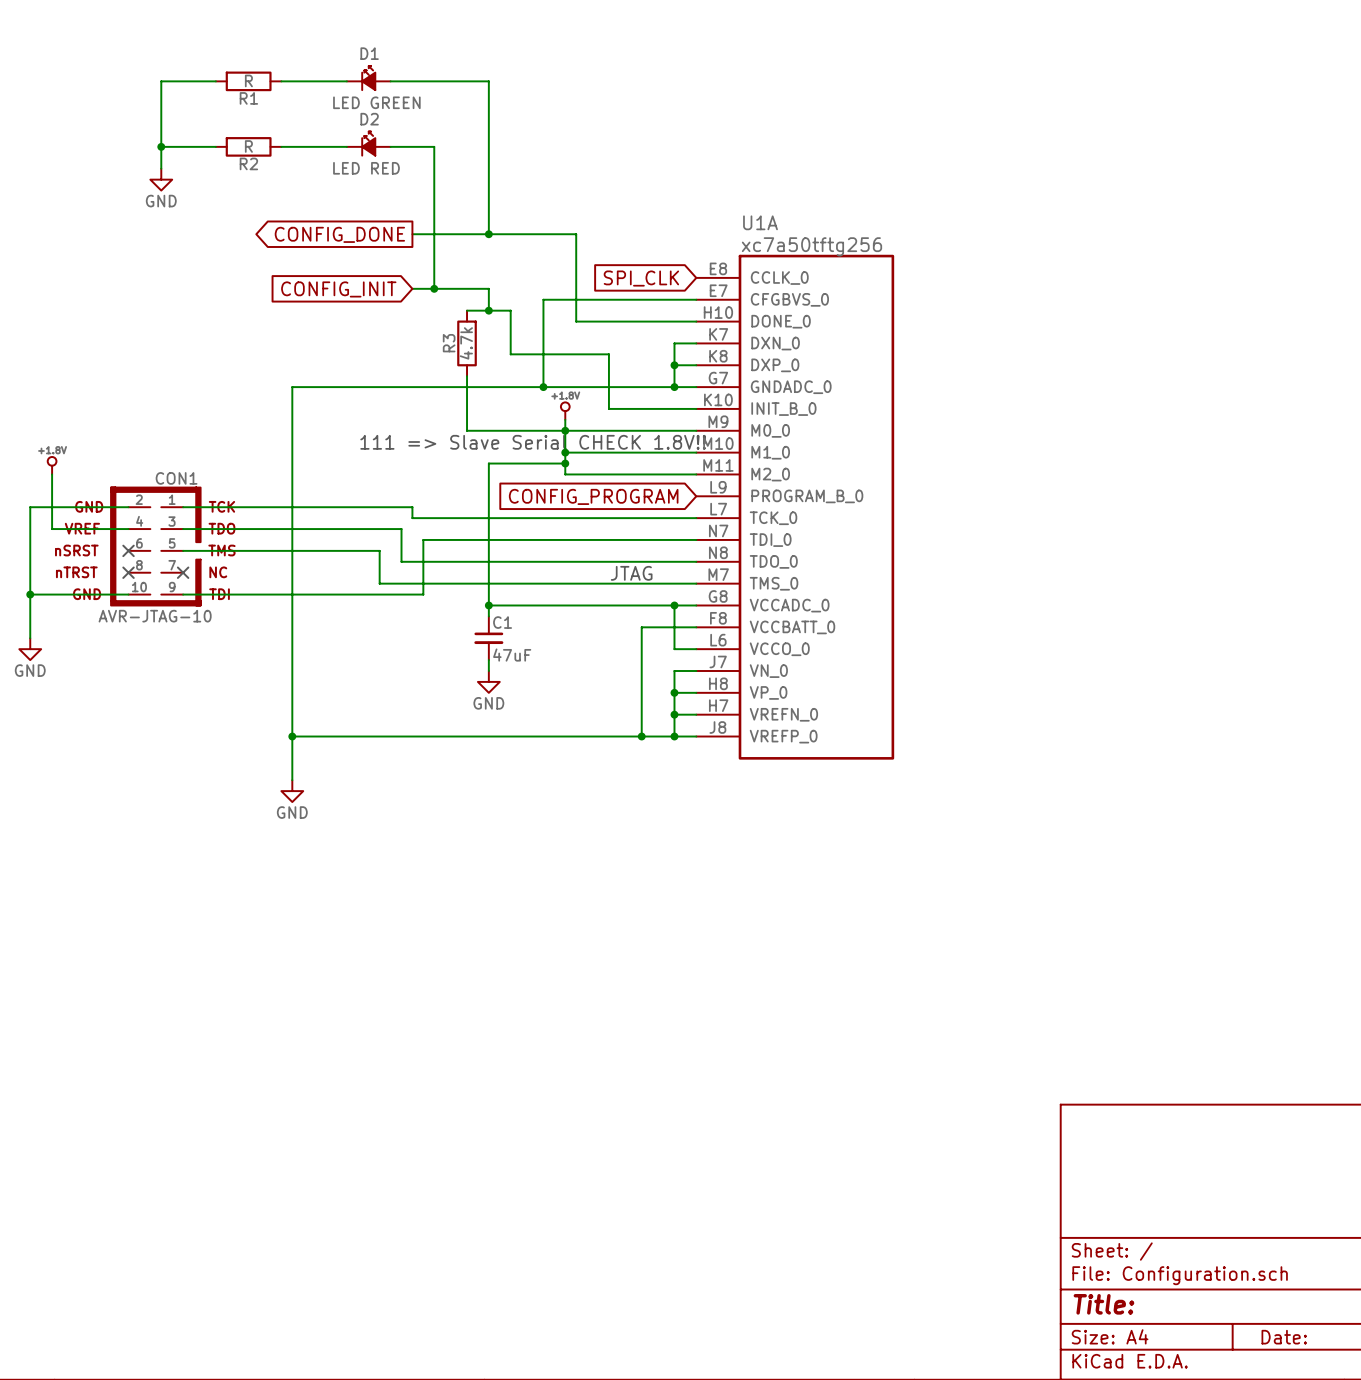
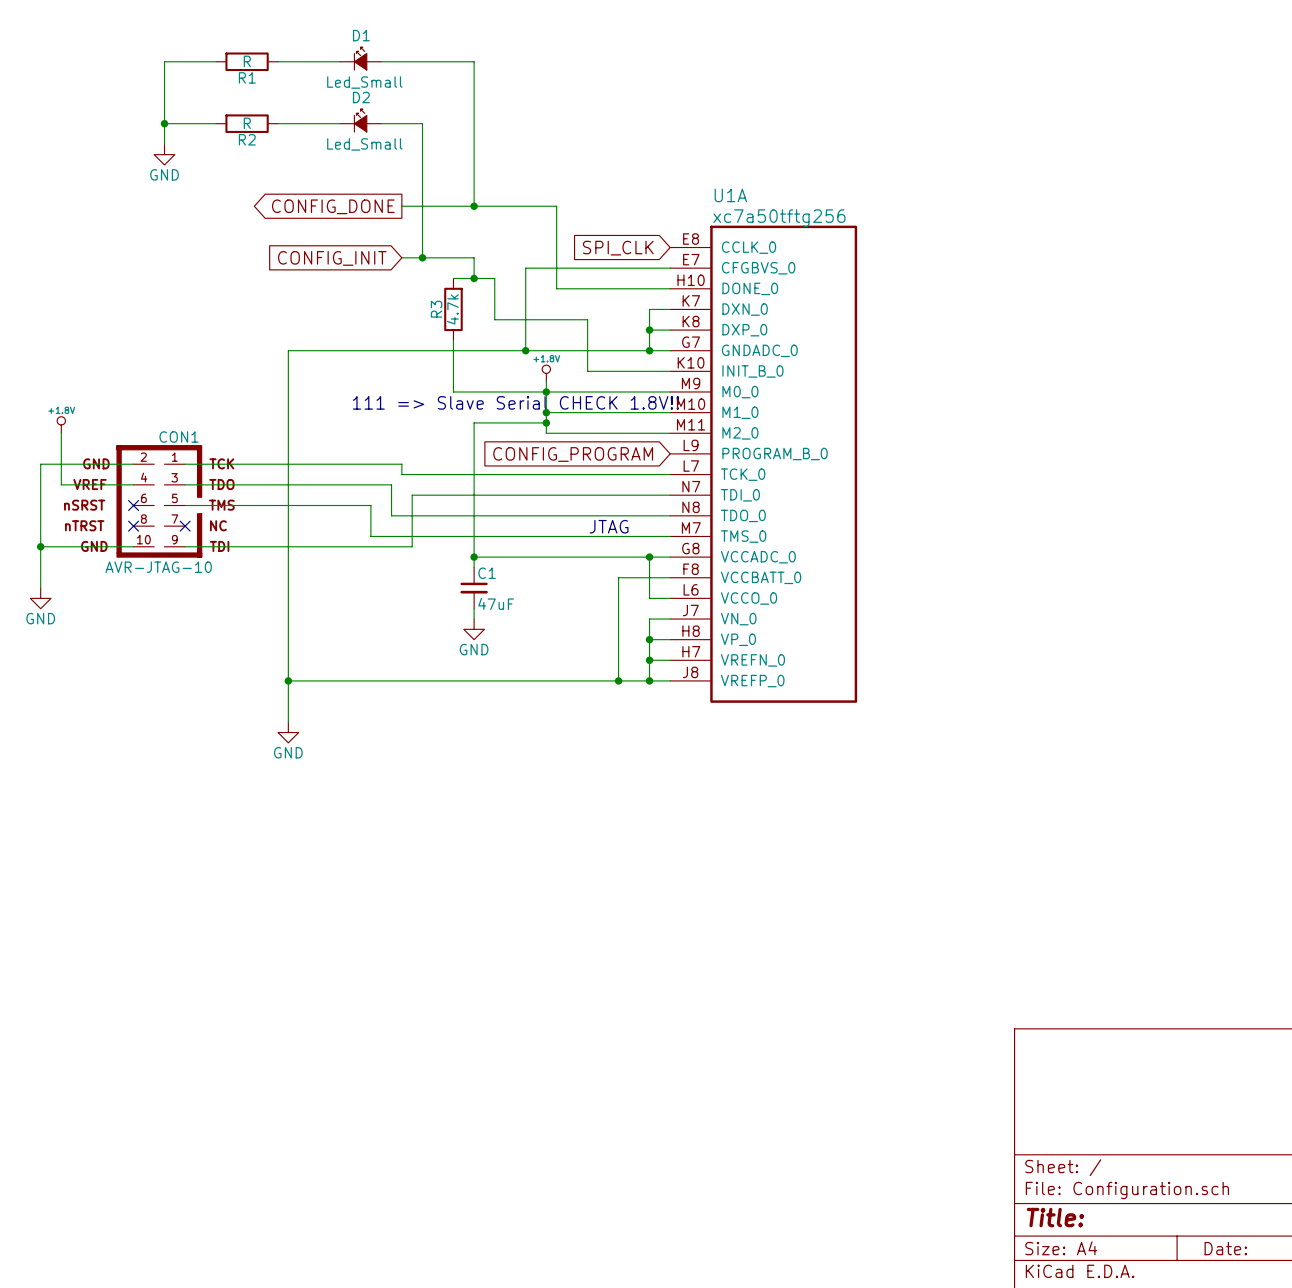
D1 value: LED GREEN (376, 102) -> Led_Small (364, 82)
D2 value: LED RED (366, 168) -> Led_Small (364, 144)

